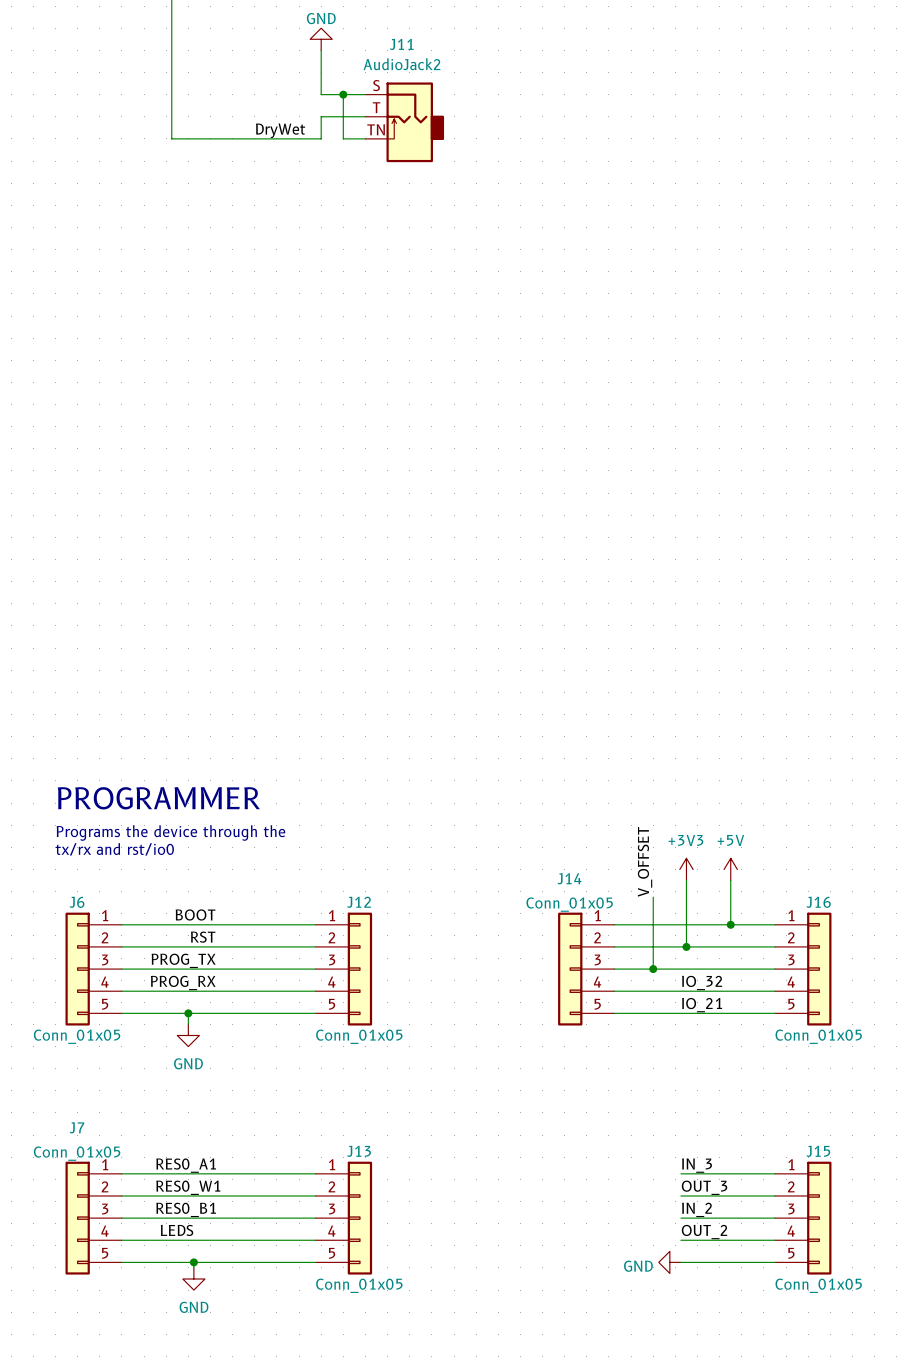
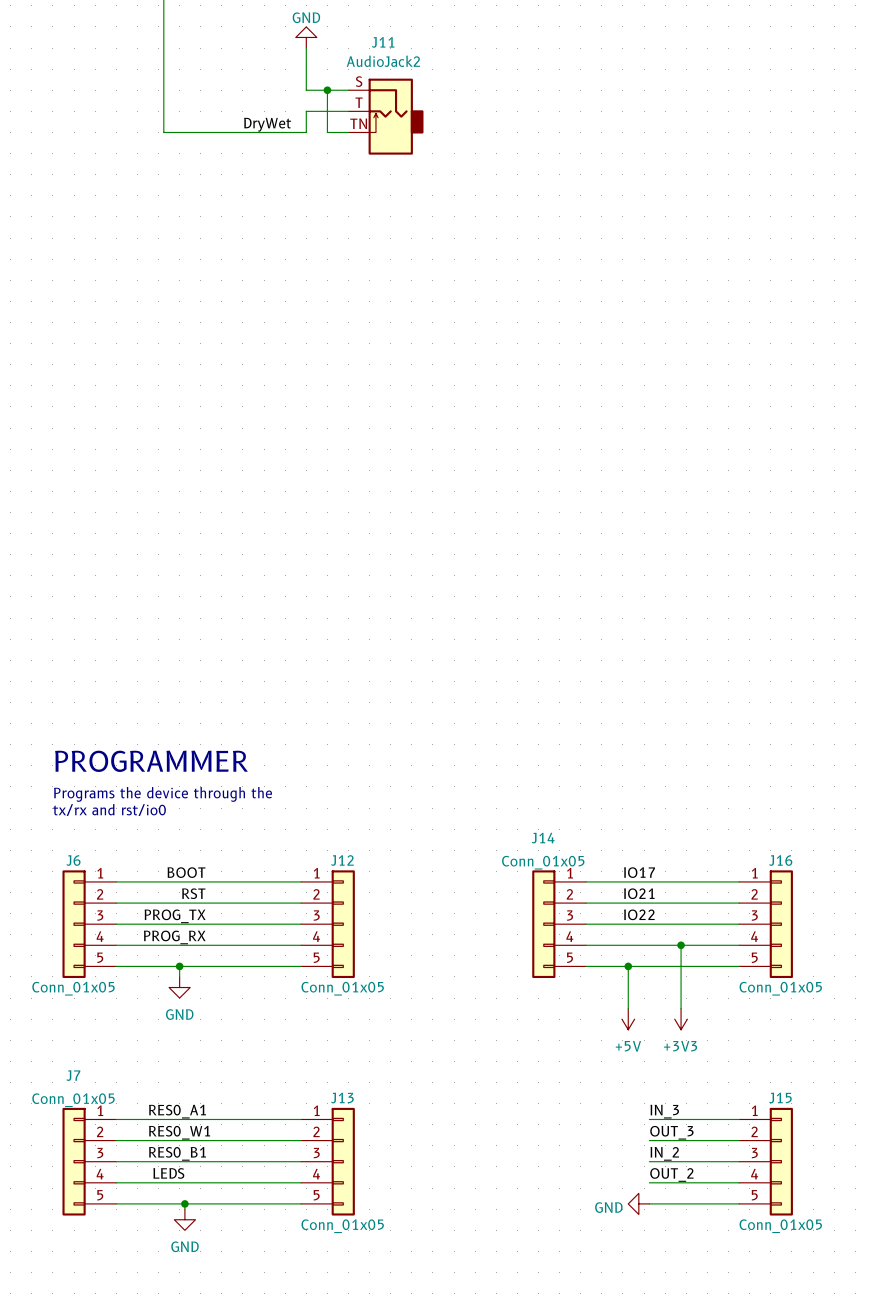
label: V_OFFSET (645, 861) -> none
power symbol rotation: 0° (686, 869) -> 180° (681, 1019)
power symbol position: +3V3 (686, 869) -> +3V3 (681, 1019)
power symbol rotation: 0° (730, 869) -> 180° (628, 1019)
power symbol position: +5V (730, 869) -> +5V (628, 1019)
wire: (686, 880) (686, 946) -> (681, 945) (681, 1008)
wire: (730, 880) (730, 924) -> (628, 966) (628, 1008)
wire: (653, 897) (653, 969) -> none
label: none -> IO17 (639, 872)
junction: (730, 924) -> none
label: none -> IO21 (639, 893)
junction: (686, 946) -> none
junction: (653, 969) -> none
label: IO_32 (702, 982) -> IO22 (639, 914)
junction: none -> (681, 945)
label: IO_21 (702, 1005) -> none
junction: none -> (628, 966)

